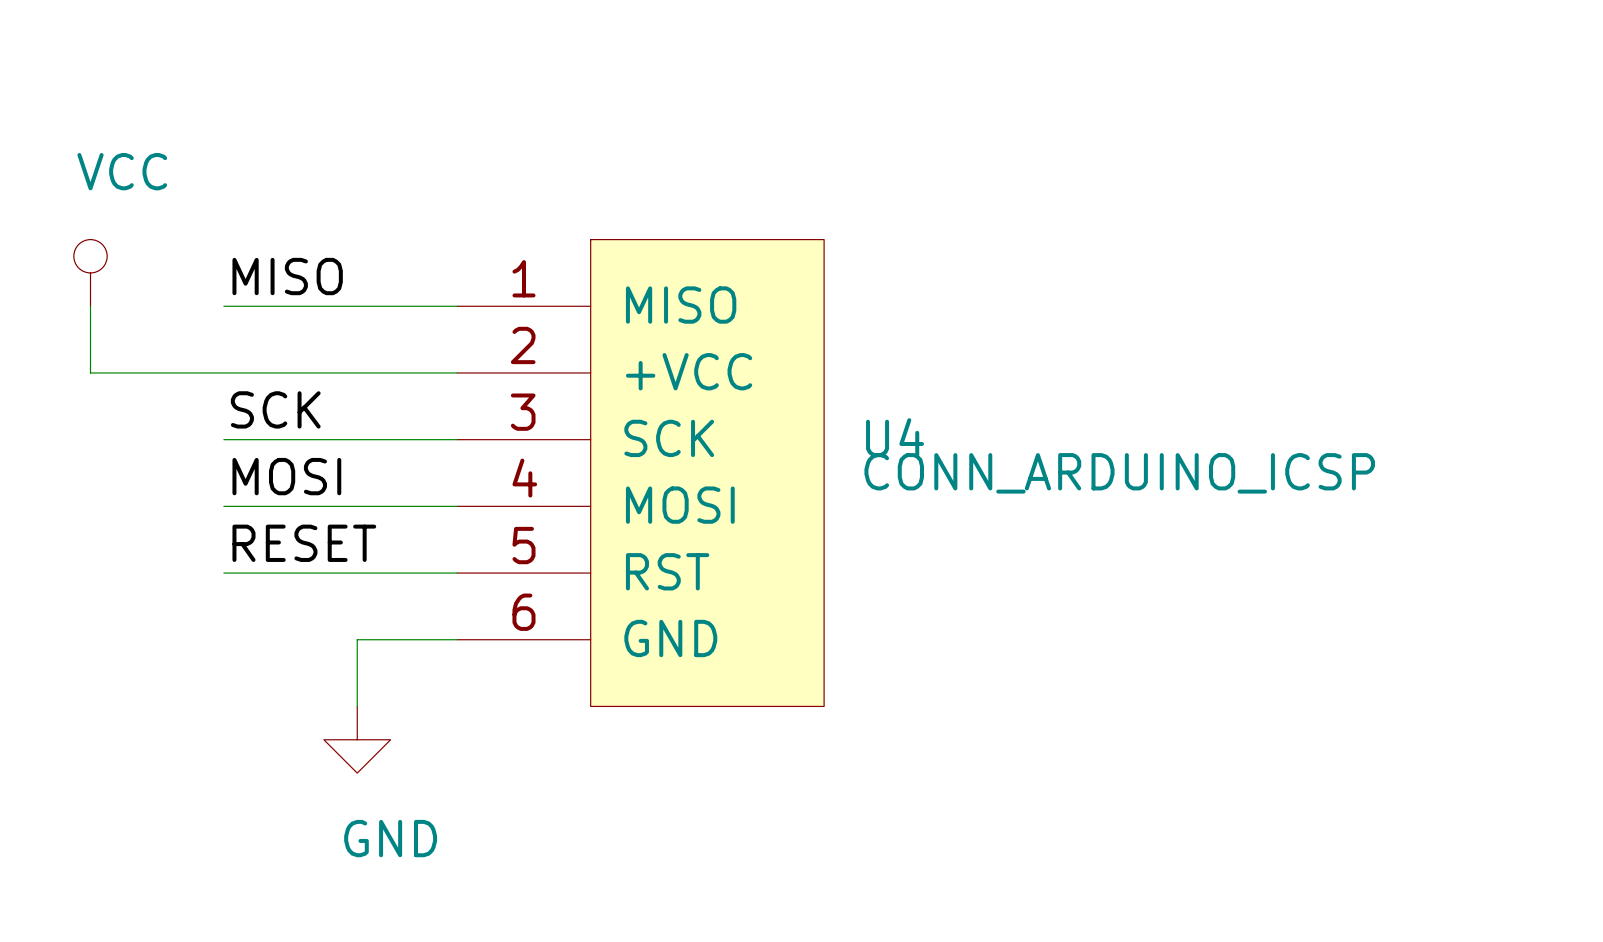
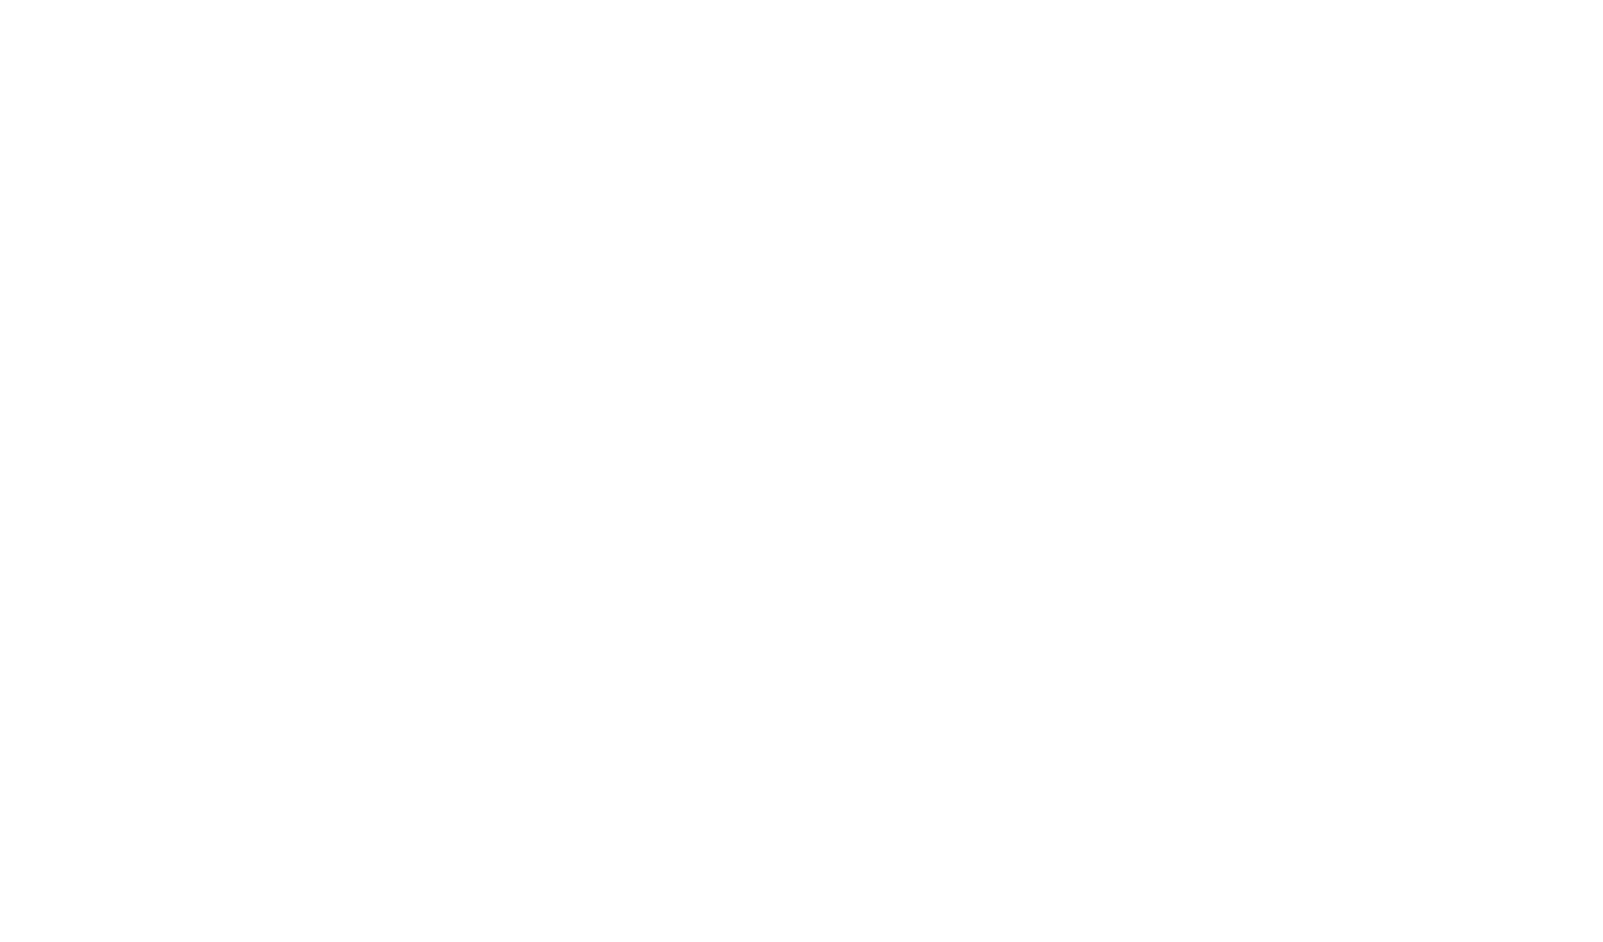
power symbol: VCC (90, 272) -> none
label: MISO (287, 276) -> none
wire: (90, 306) (90, 372) (457, 372) -> none
wire: (223, 306) (457, 306) -> none
label: SCK (275, 409) -> none
wire: (223, 439) (457, 439) -> none
U4: CONN_ARDUINO_ICSP (640, 473) -> none
label: MOSI (286, 476) -> none
wire: (223, 506) (457, 506) -> none
label: RESET (304, 543) -> none
wire: (223, 573) (457, 573) -> none
wire: (457, 639) (357, 639) (357, 706) -> none
power symbol: GND (357, 739) -> none

